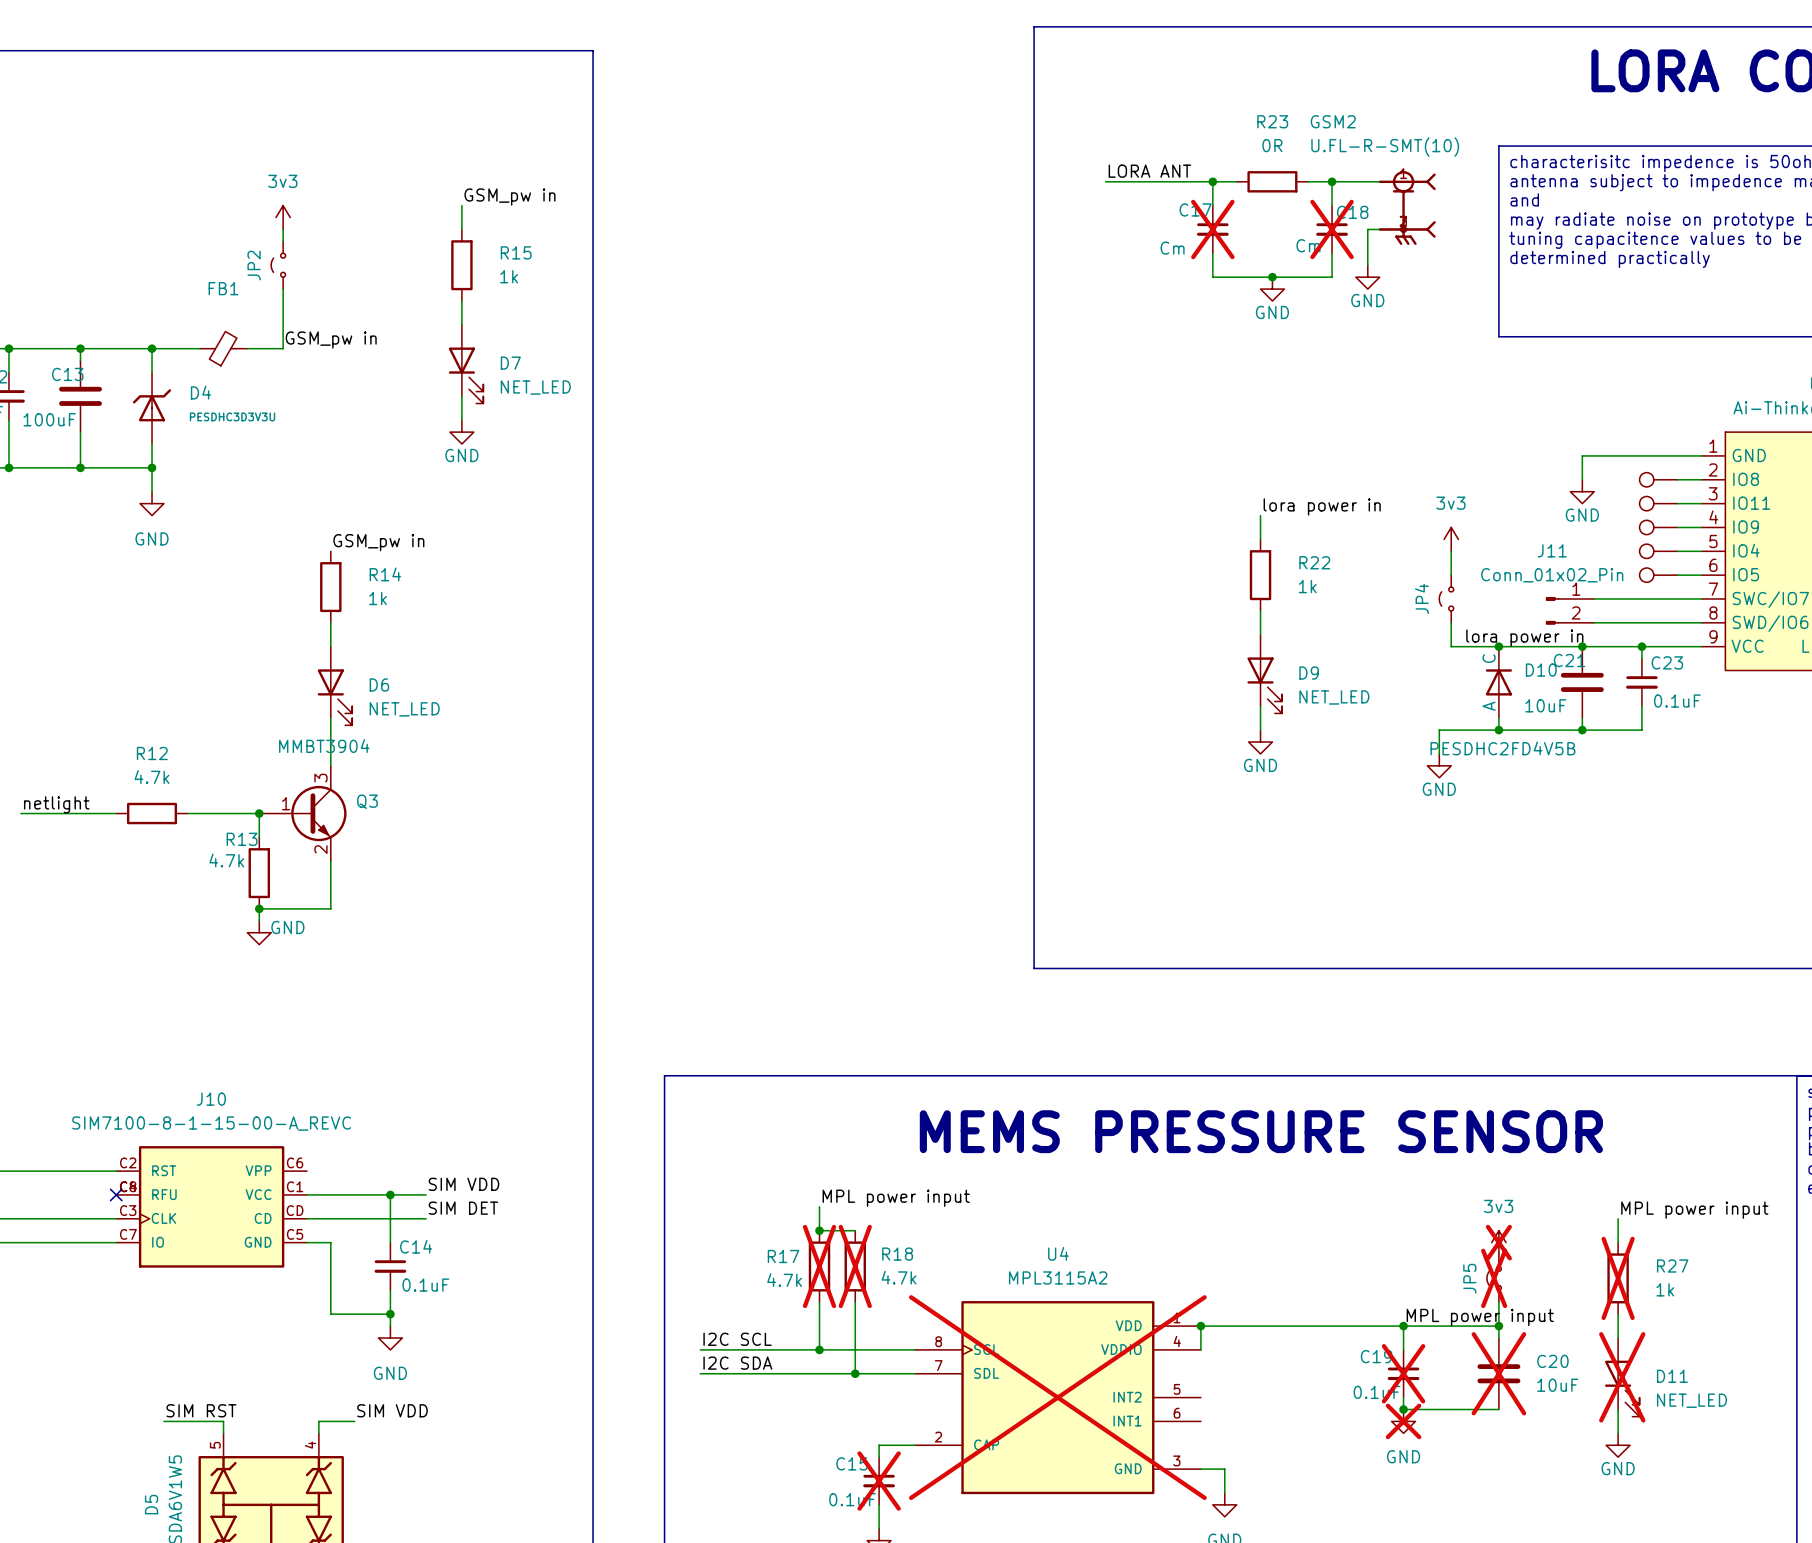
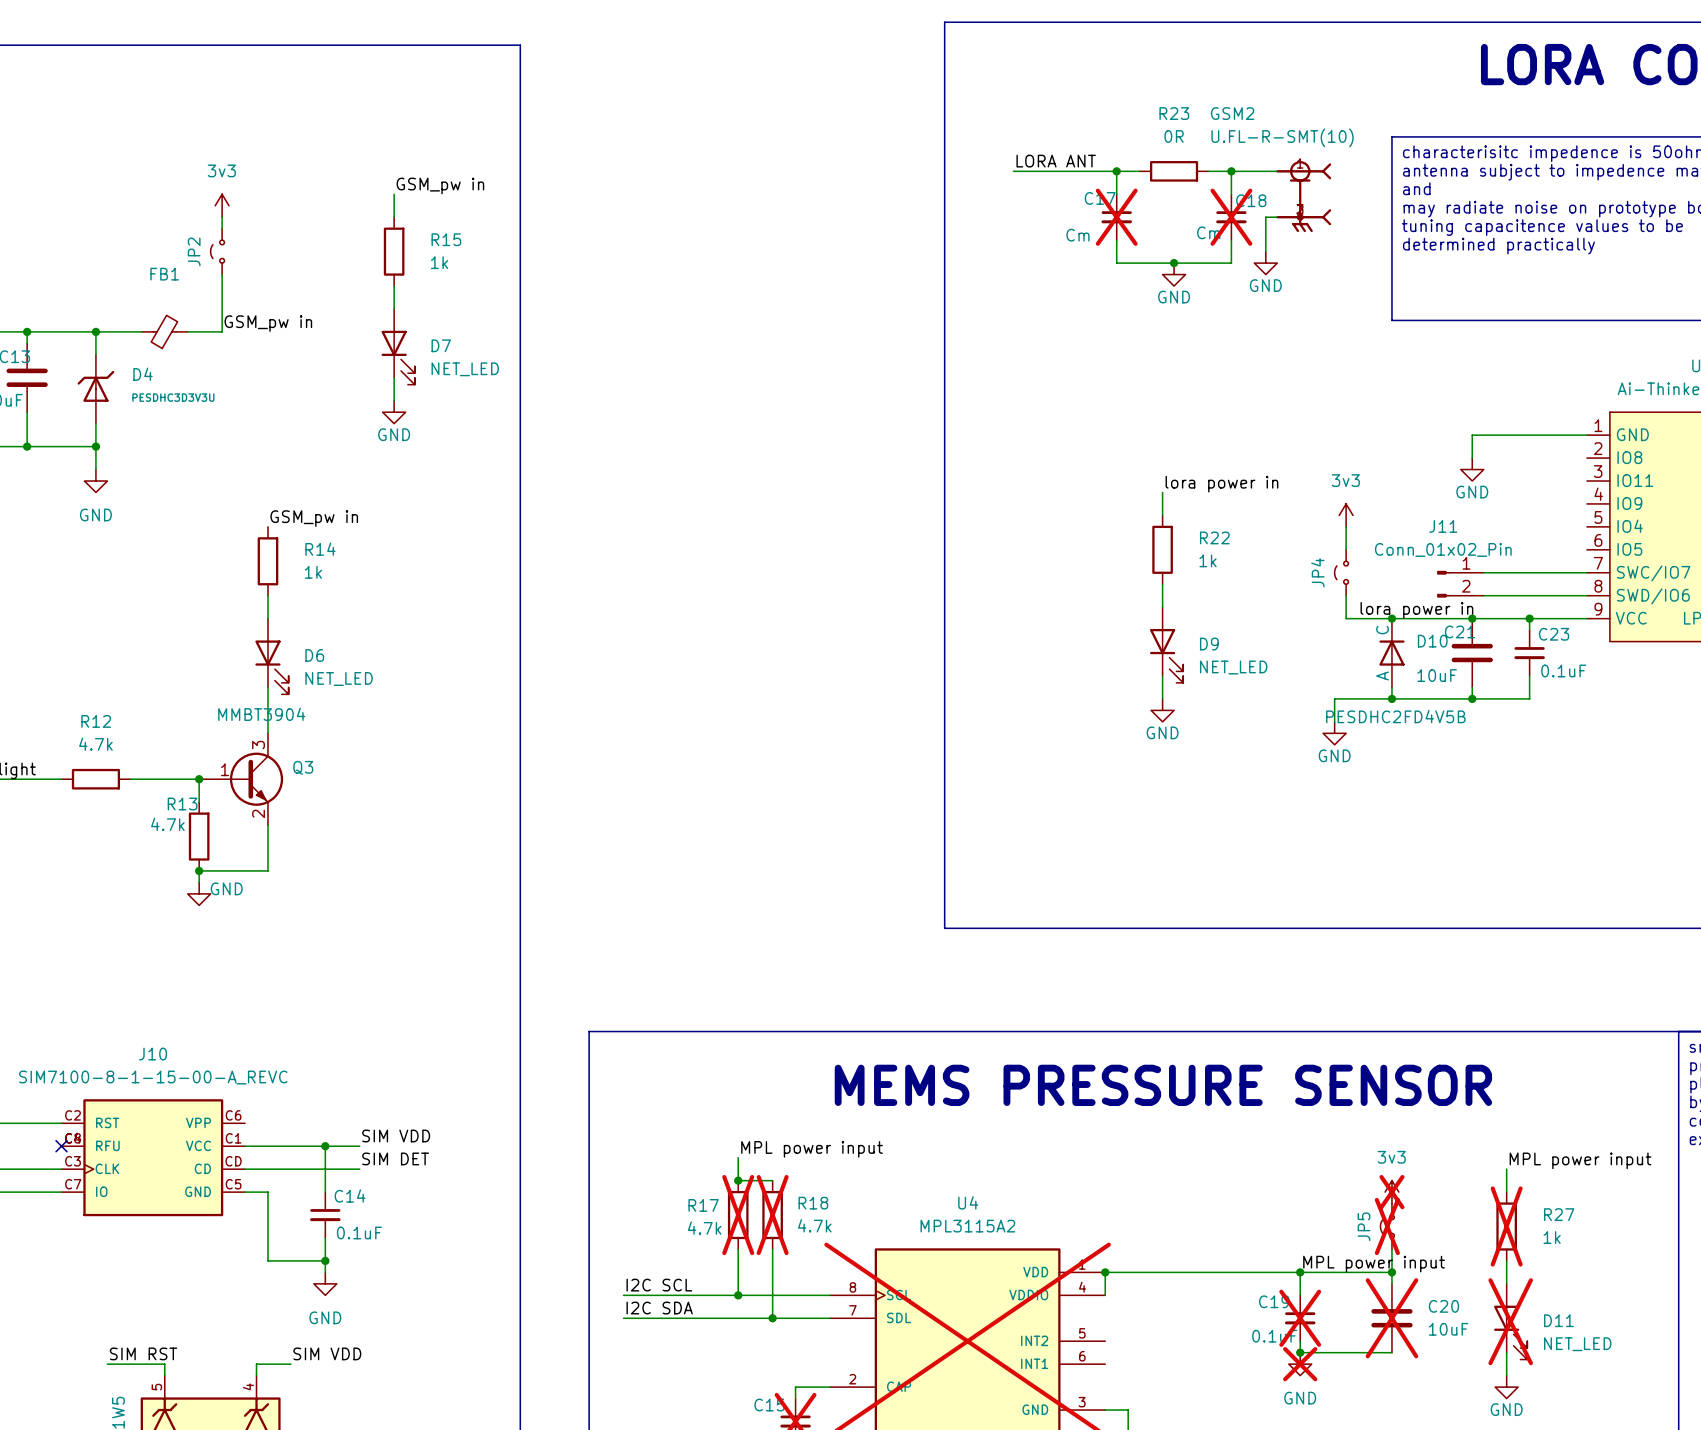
part: (1658, 479) -> none
wire: (1677, 479) (1701, 479) -> none
part: (1658, 503) -> none
wire: (1677, 503) (1701, 503) -> none
part: (1658, 527) -> none
wire: (1677, 527) (1701, 527) -> none
part: (1658, 551) -> none
wire: (1677, 551) (1701, 551) -> none
part: (1658, 575) -> none
wire: (1677, 575) (1701, 575) -> none

